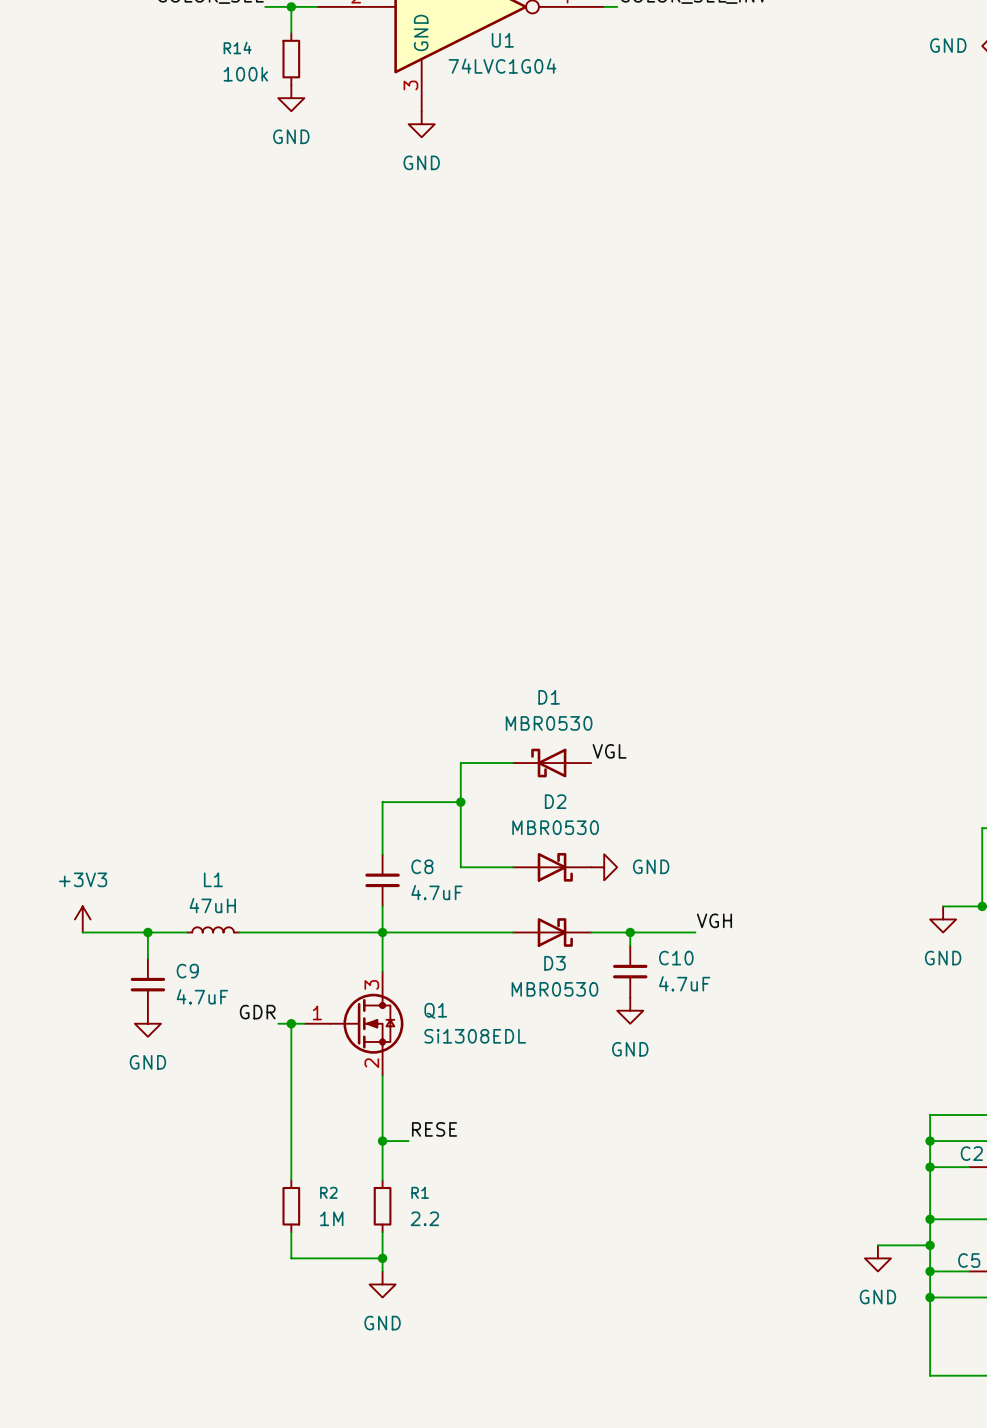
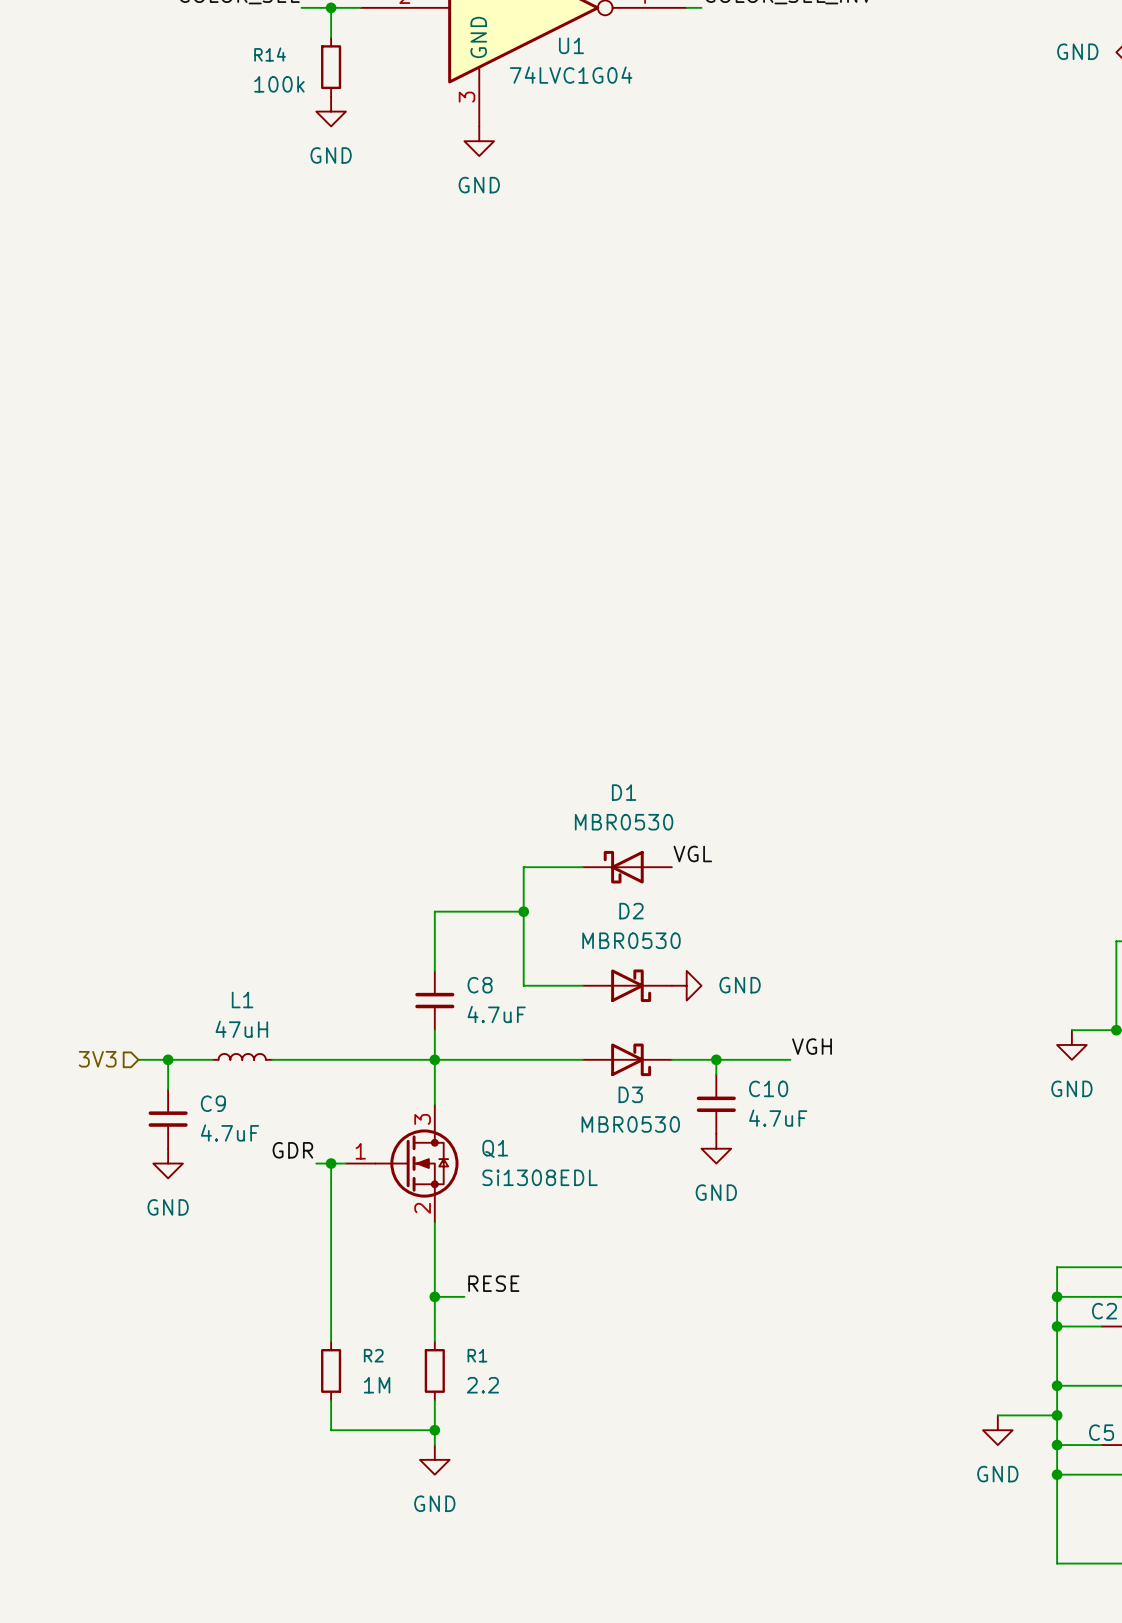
power symbol: +3V3 (82, 919) -> none
wire: (82, 932) (121, 932) -> none
hierarchical label: none -> 3V3 (97, 1059)

